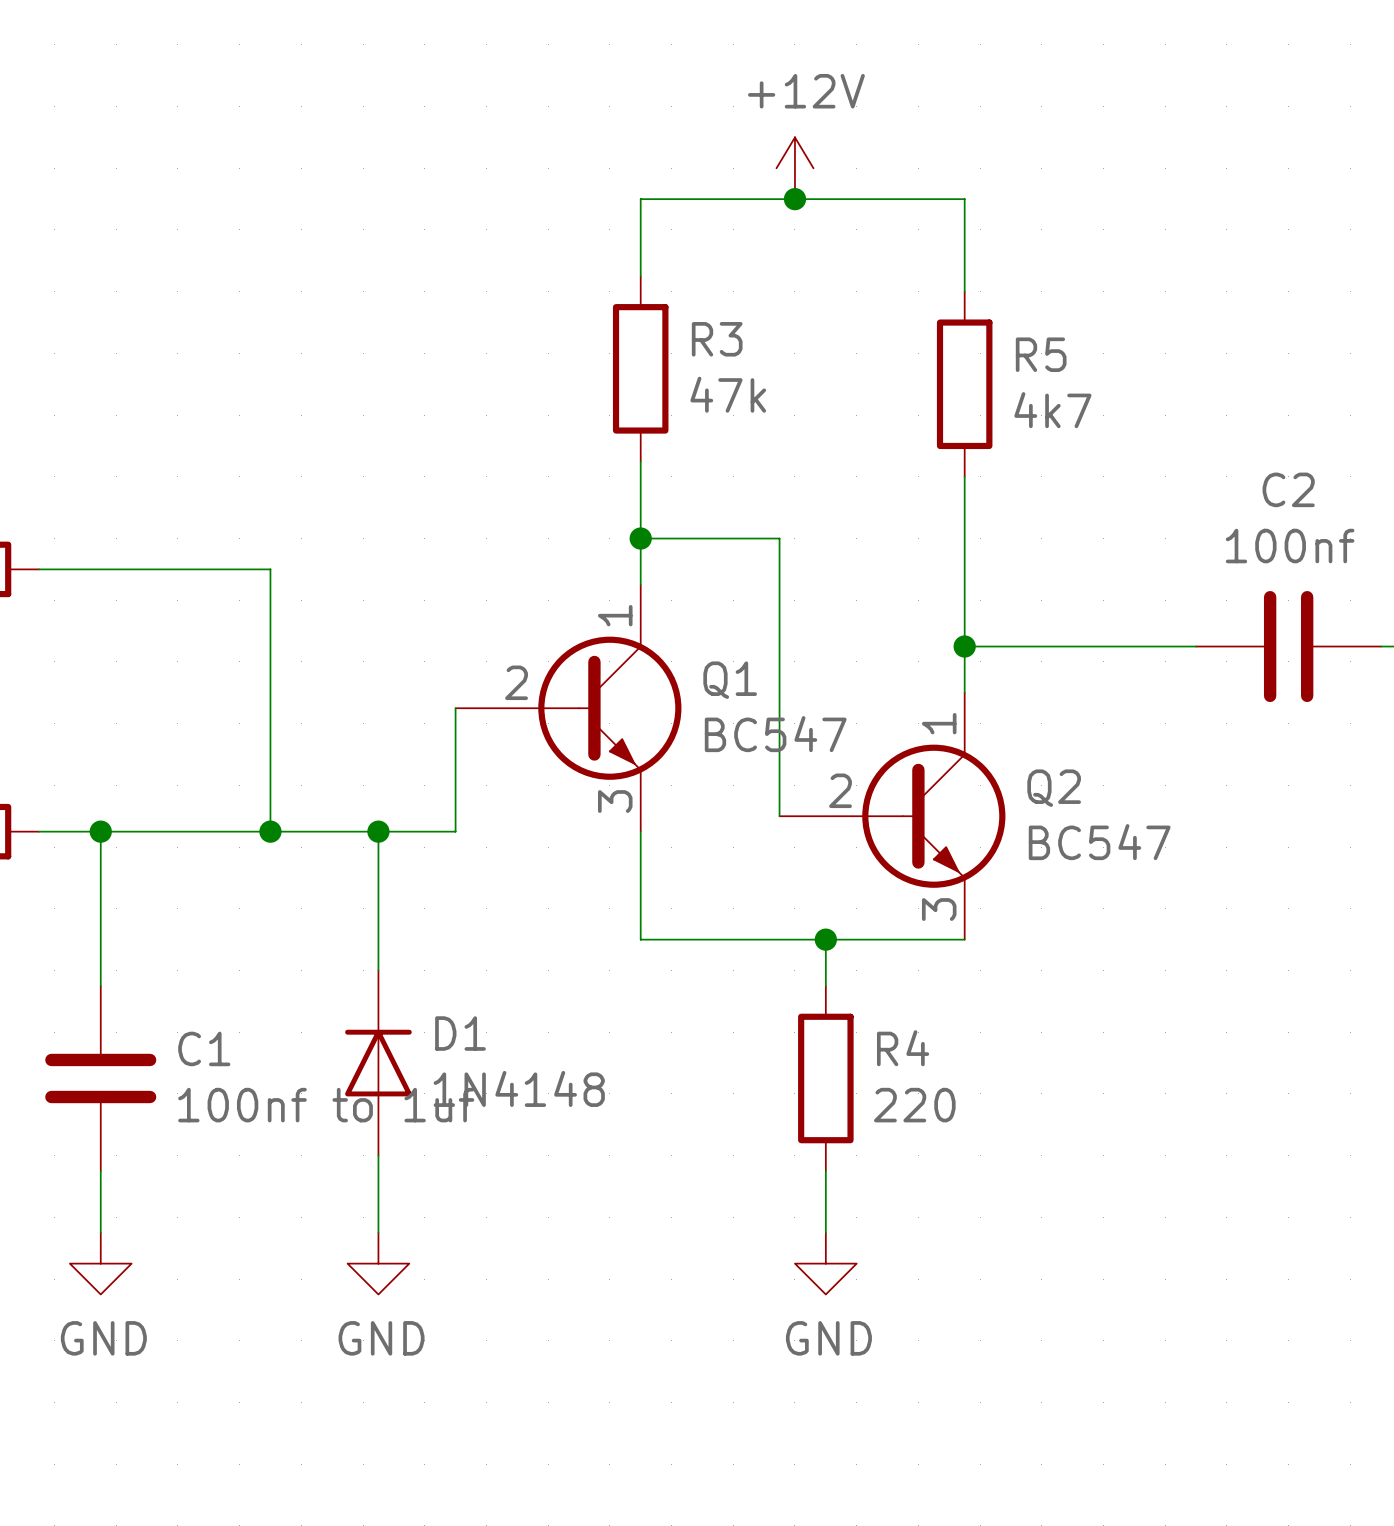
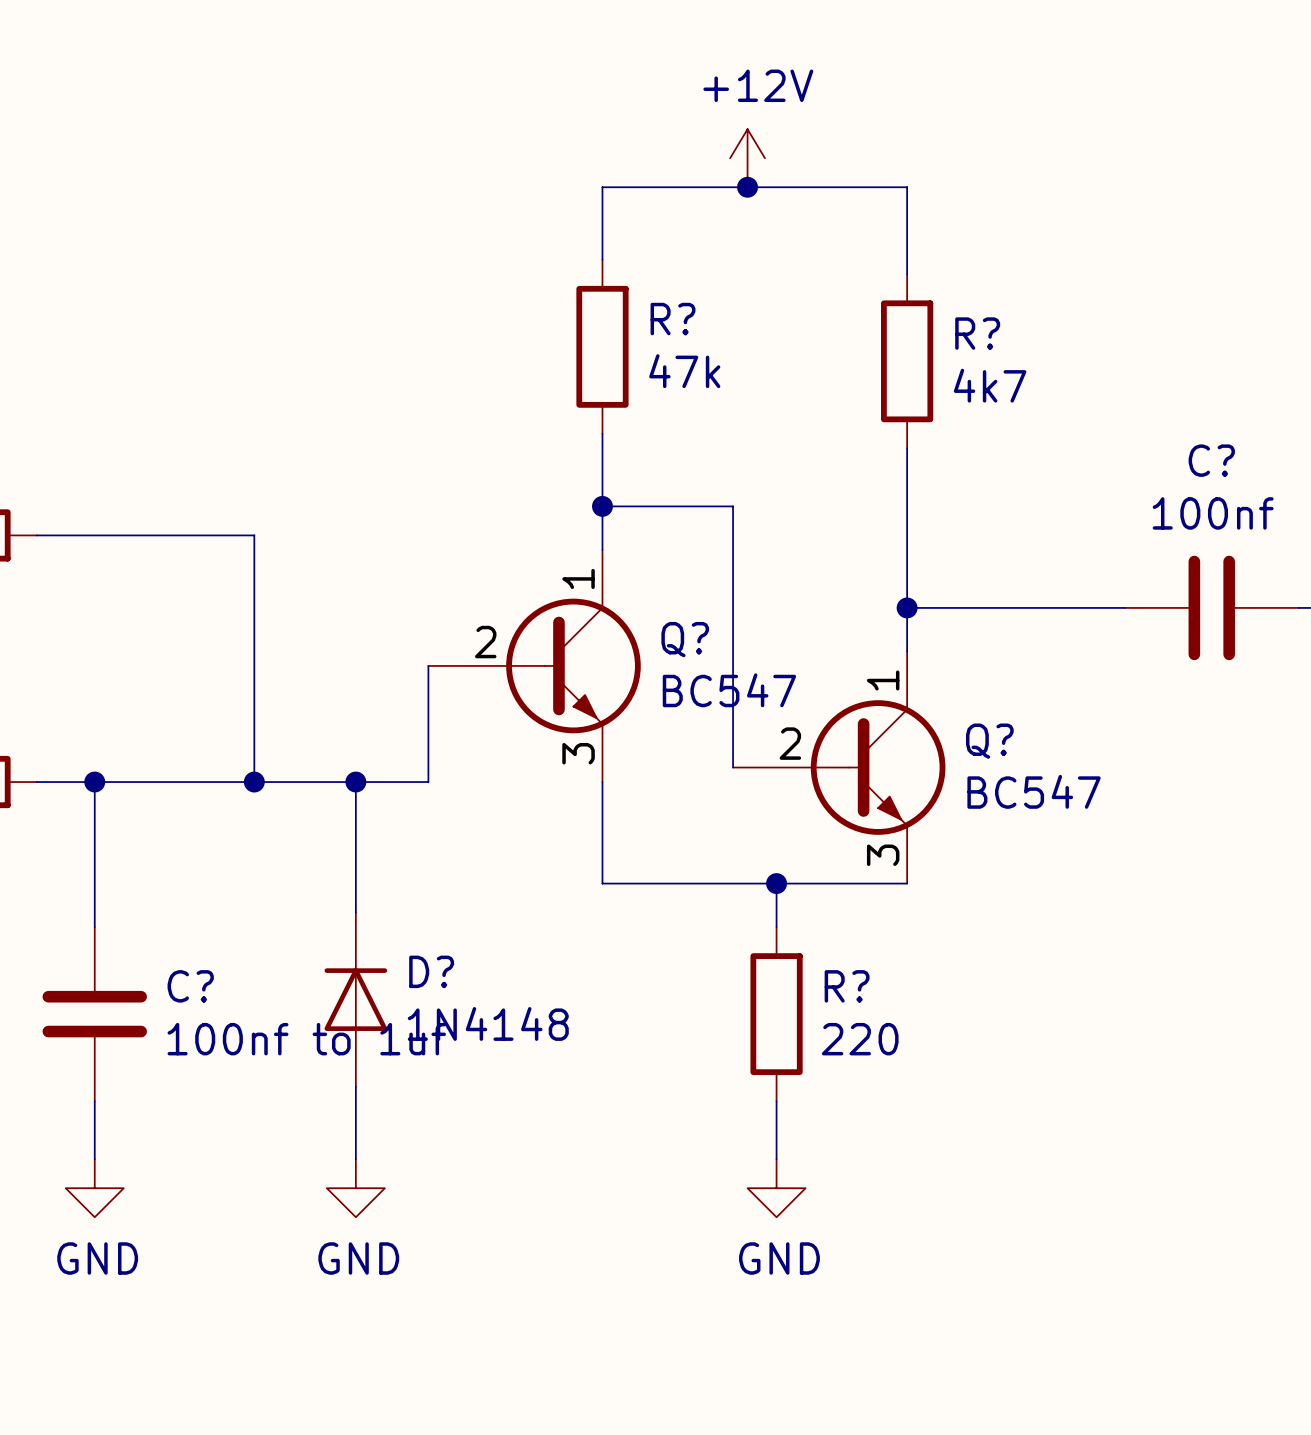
R3 name: R3 (717, 339) -> R? (673, 319)
R5 name: R5 (1041, 354) -> R? (977, 333)
C2 name: C2 (1288, 489) -> C? (1211, 460)
Q1 name: Q1 (730, 680) -> Q? (685, 639)
Q2 name: Q2 (1054, 788) -> Q? (989, 741)
D1 name: D1 (460, 1033) -> D? (431, 971)
C1 name: C1 (204, 1048) -> C? (190, 986)
R4 name: R4 (903, 1048) -> R? (847, 986)

